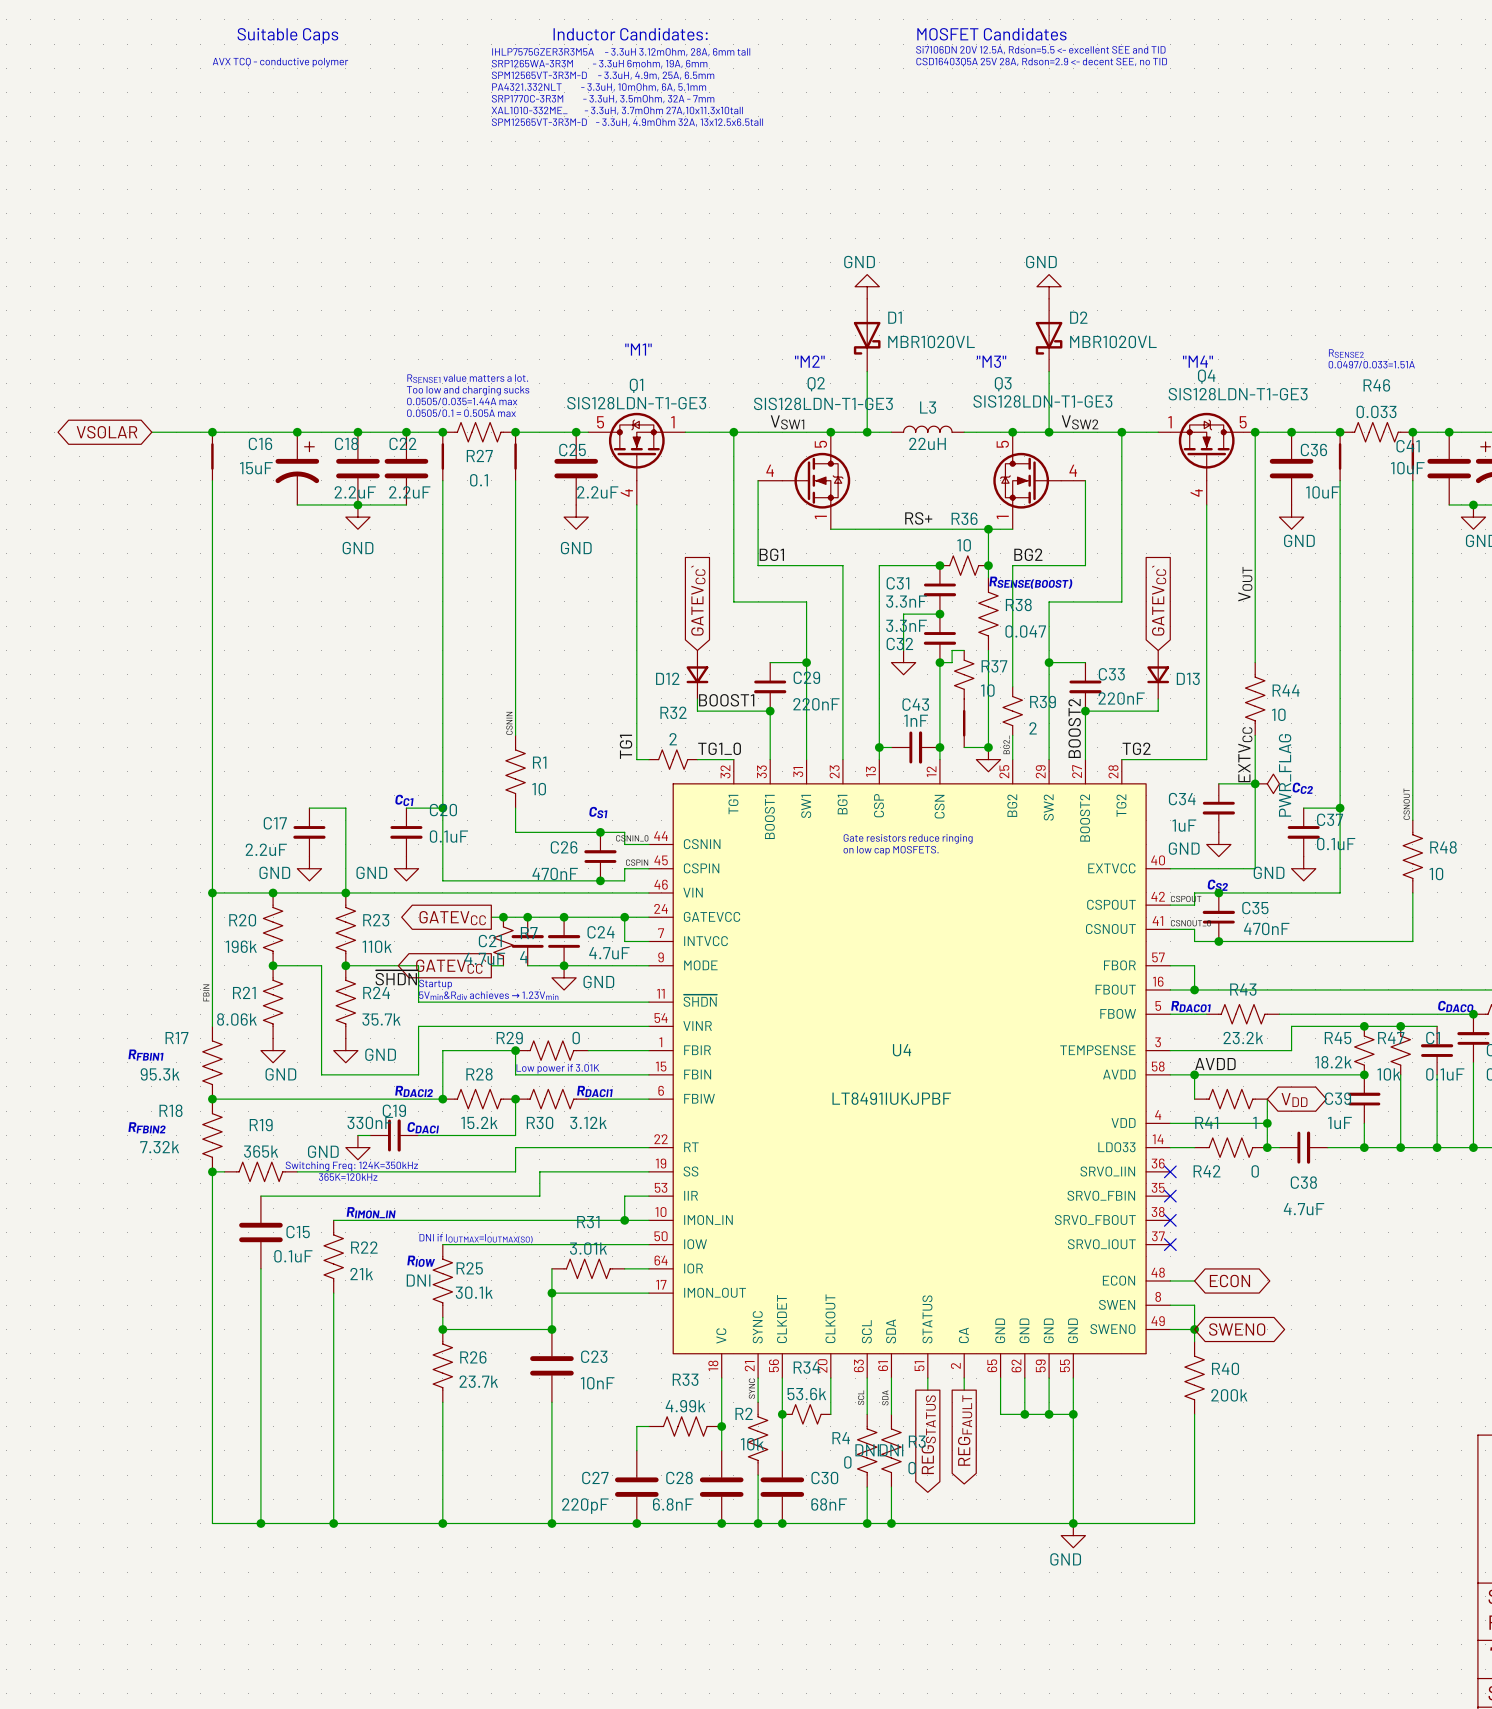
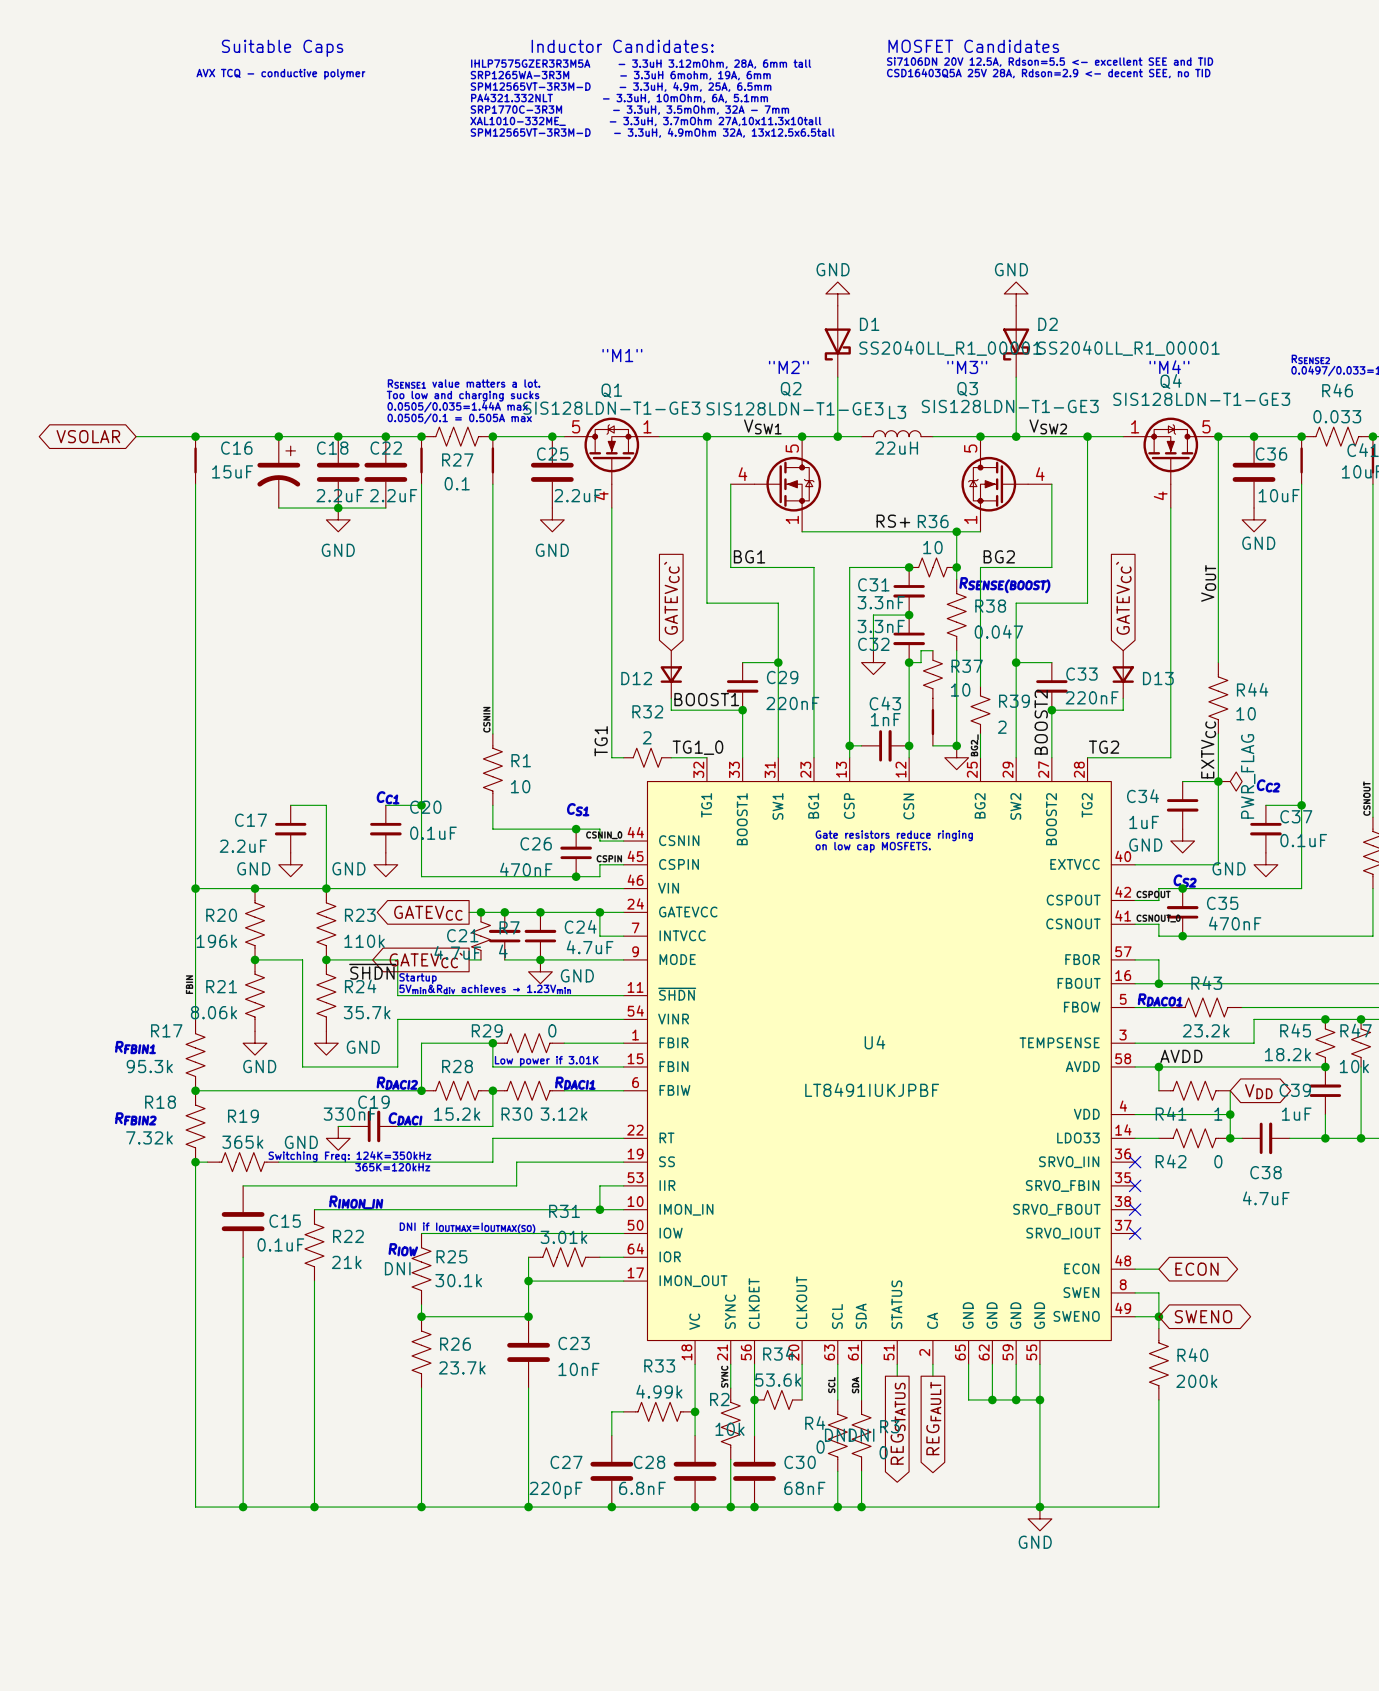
D1 value: MBR1020VL (931, 341) -> SS2040LL_R1_00001 (950, 348)
D2 value: MBR1020VL (1113, 341) -> SS2040LL_R1_00001 (1128, 348)

